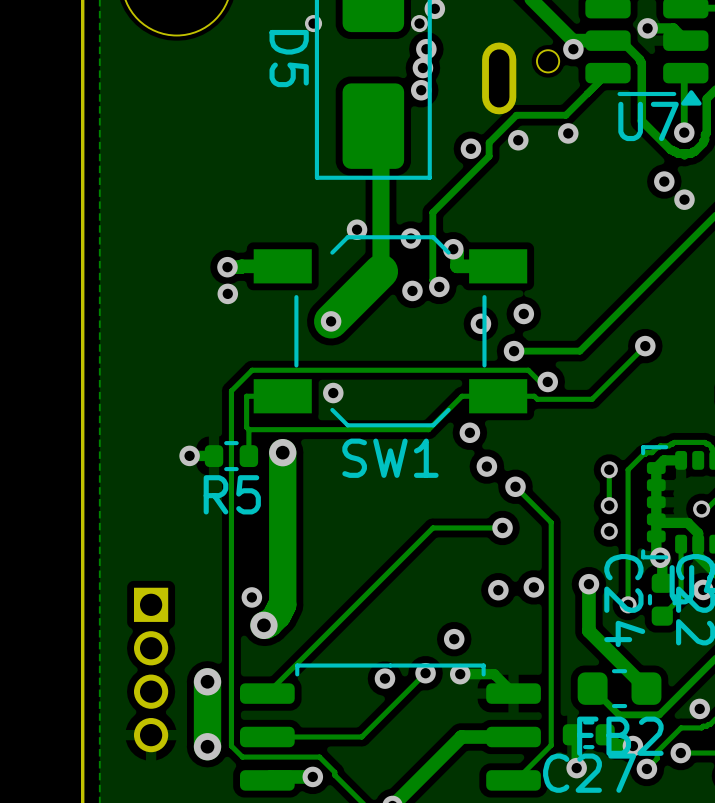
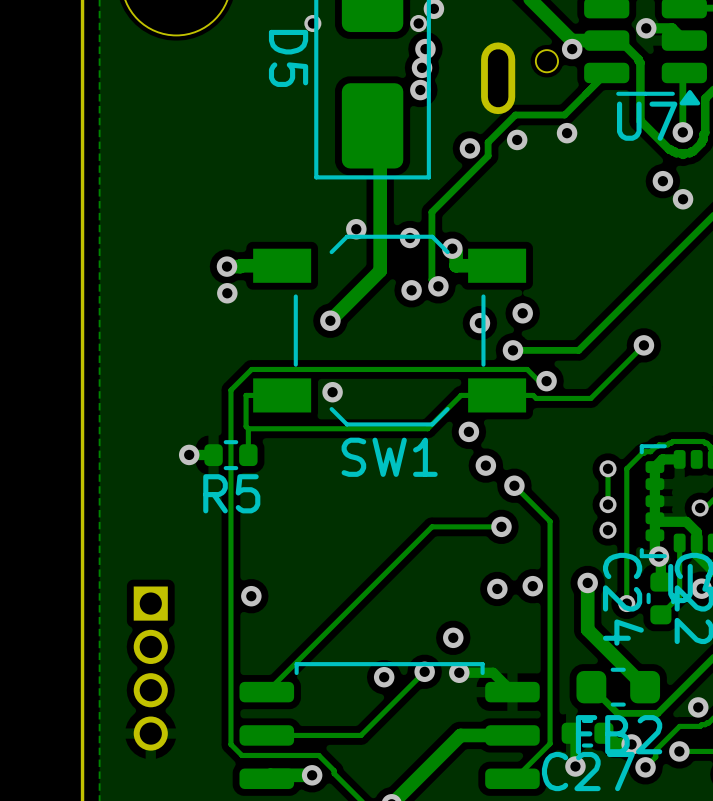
track width: thick (373, 126) (380, 133) (380, 271) (331, 321) -> thin (372, 125) (380, 133) (380, 270) (330, 320)
track: (282, 452) (282, 604) (277, 615) (269, 623) (263, 625) -> none
via: (282, 452) -> none
via: (263, 625) -> none
track: (207, 681) (207, 746) -> none
via: (207, 681) -> none
via: (207, 746) -> none

